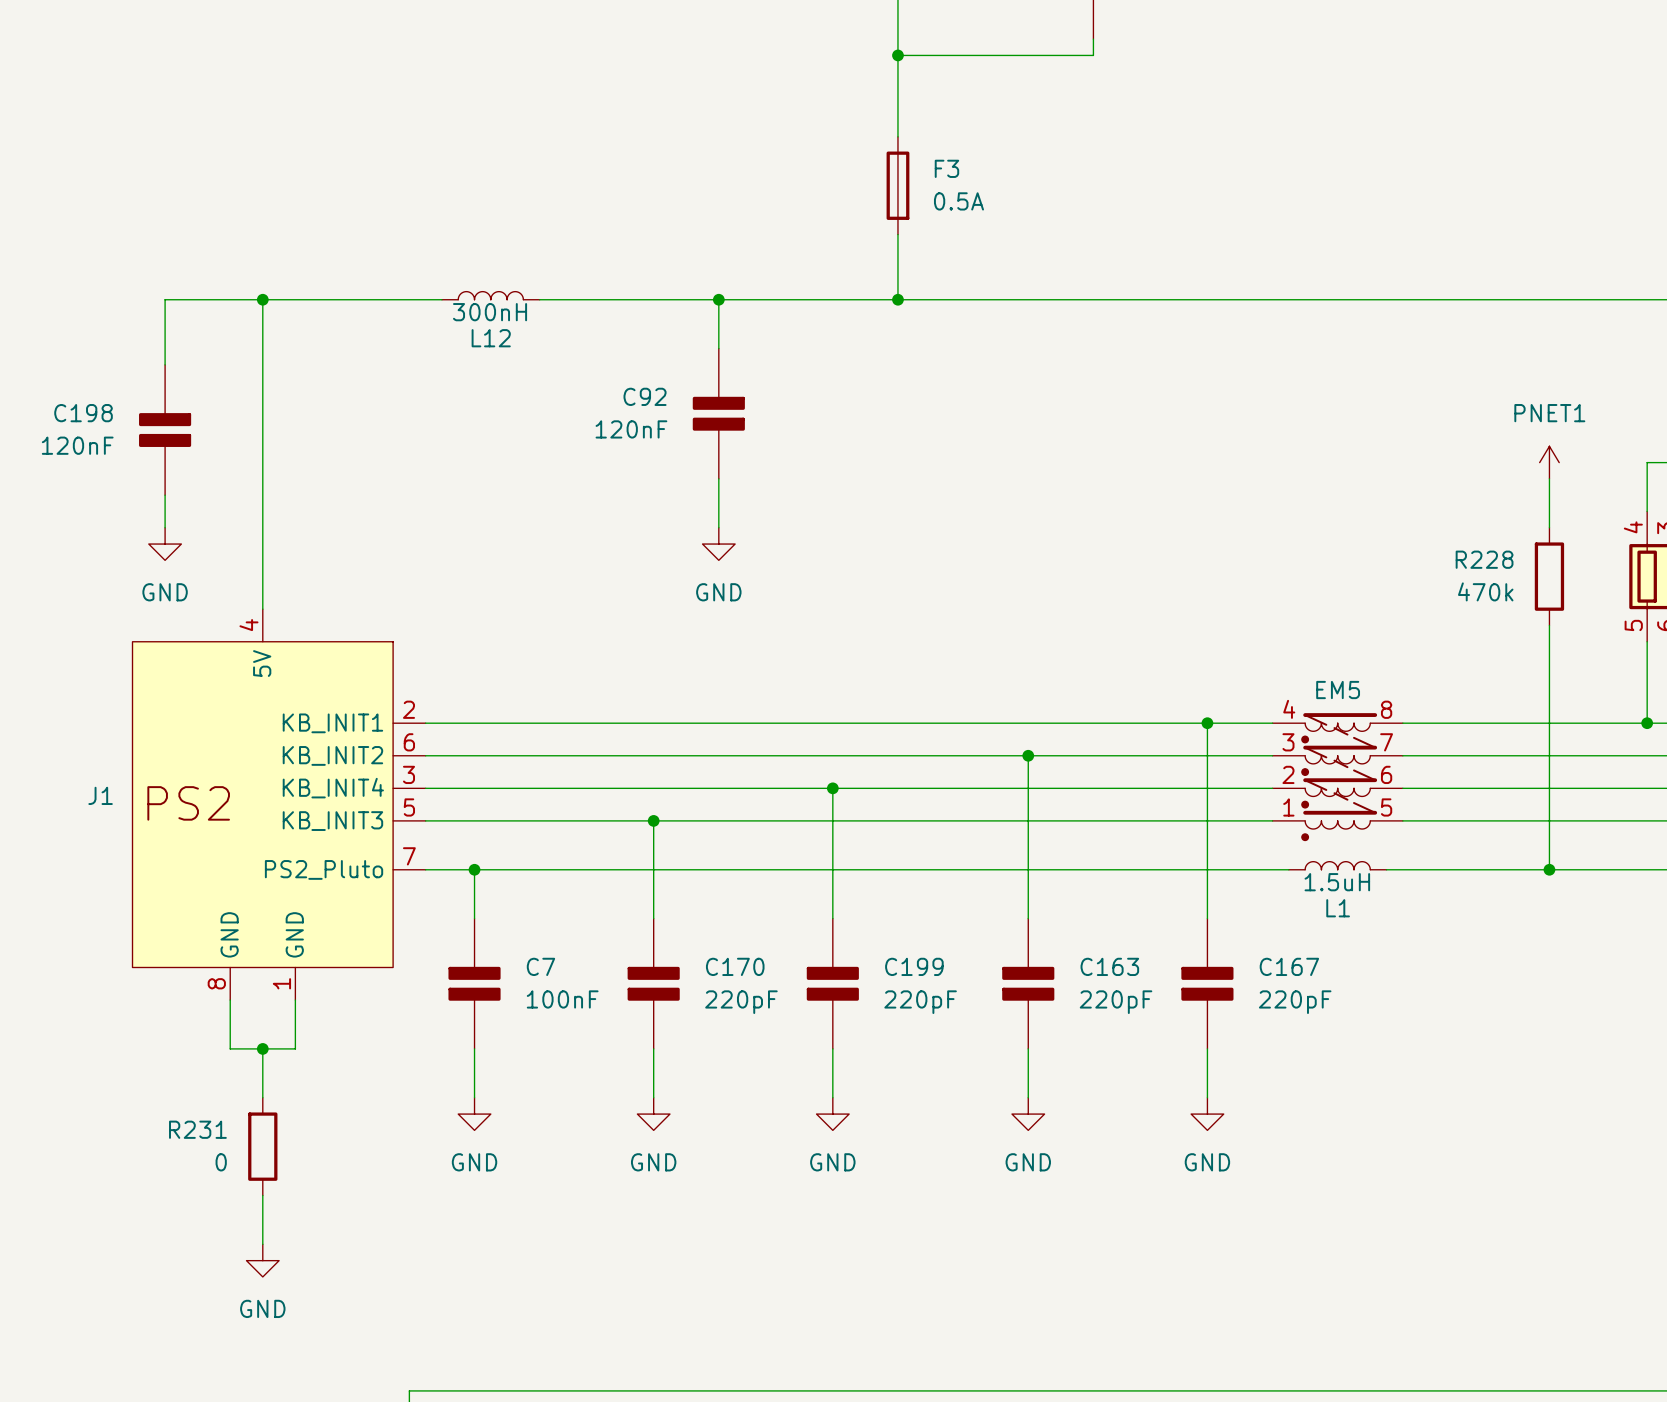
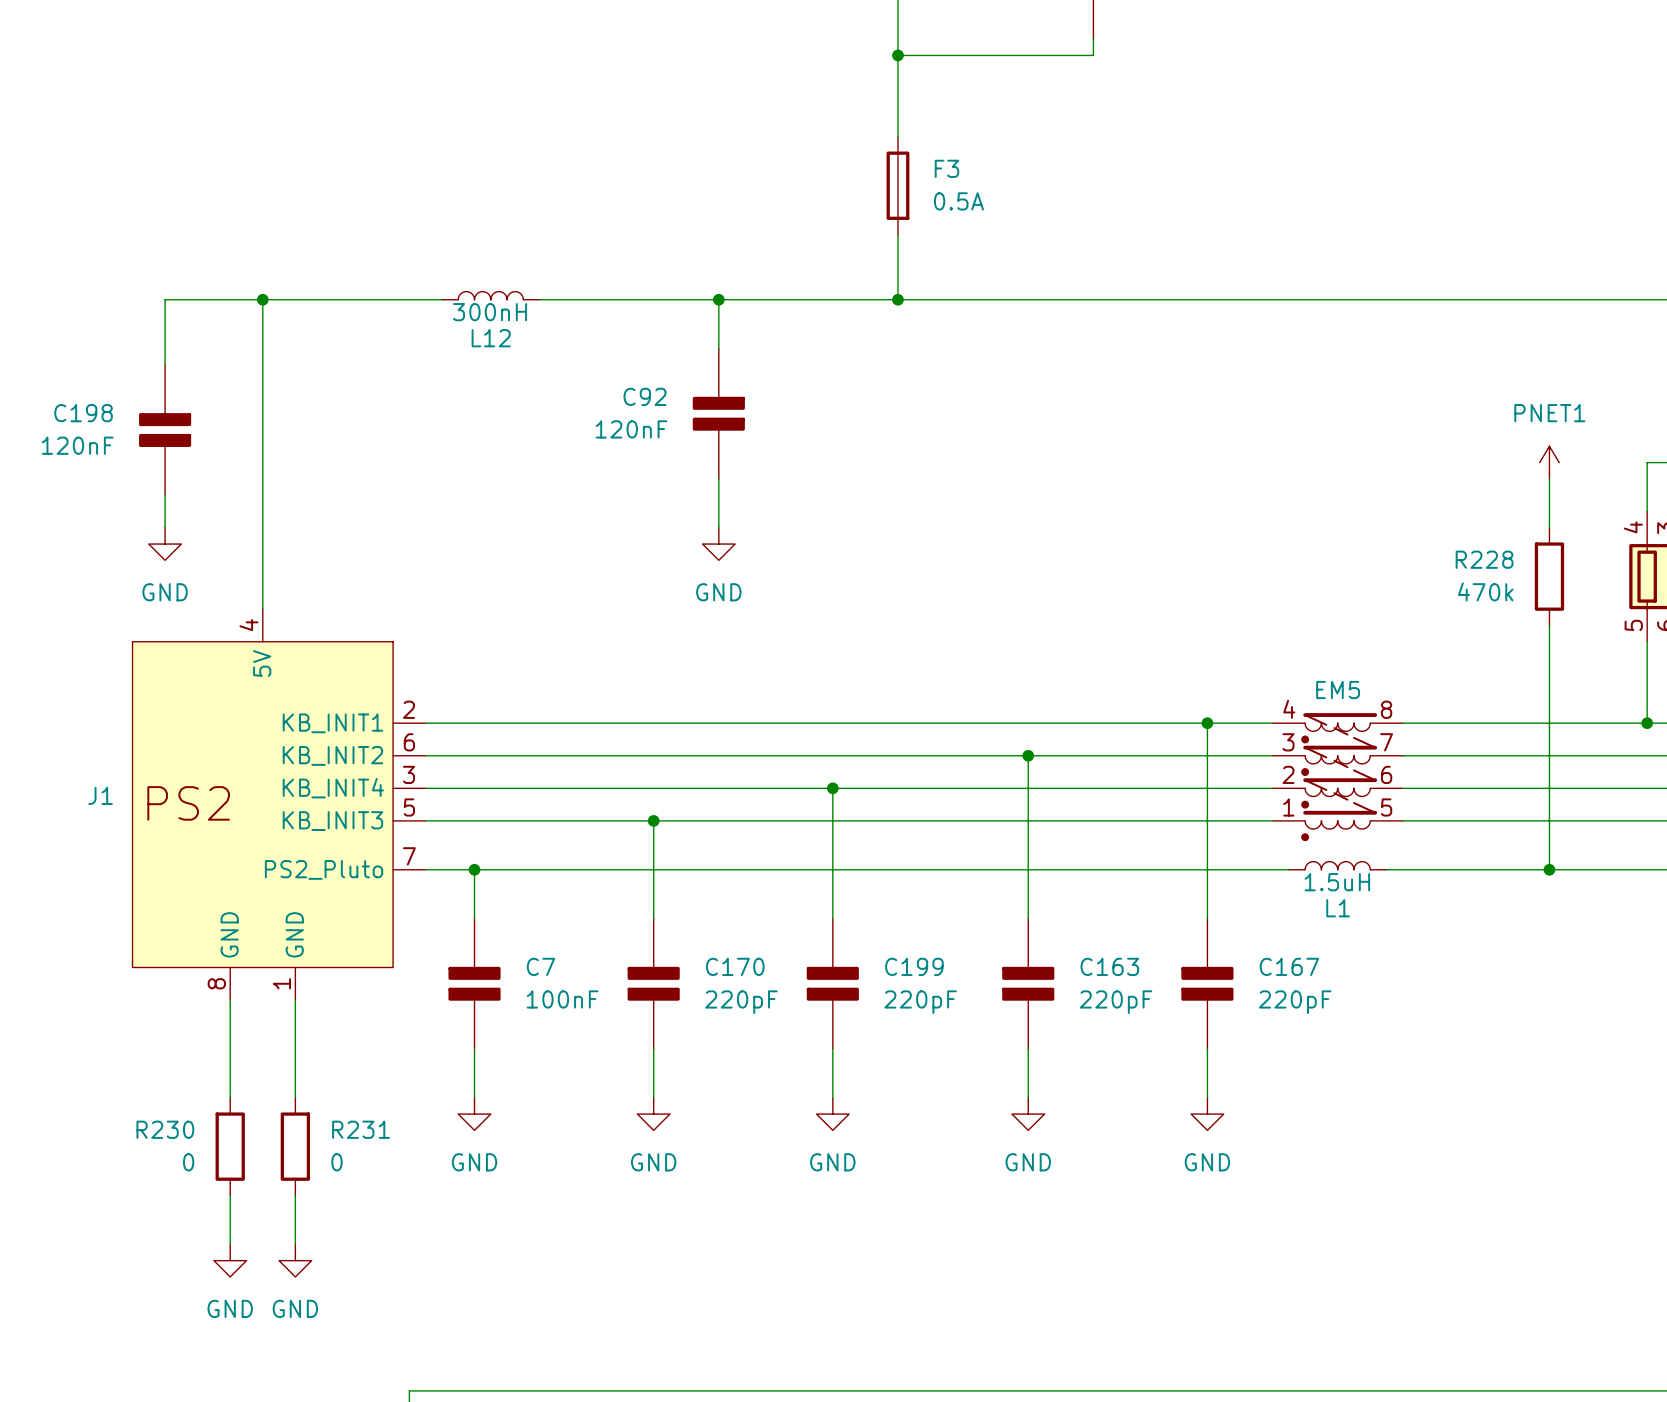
wire: (230, 1048) (295, 1048) -> (230, 1048) (230, 1097)
wire: (262, 1048) (262, 1097) -> (295, 1048) (295, 1097)
junction: (262, 1048) -> none
R231 name position: R231 (197, 1129) -> R231 (361, 1129)
R230: none -> 0 (230, 1146)
R231 position: (262, 1146) -> (295, 1146)
R231 value position: 0 (221, 1162) -> 0 (336, 1162)
wire: none -> (230, 1195) (230, 1244)
wire: (262, 1195) (262, 1244) -> (295, 1195) (295, 1244)
power symbol: none -> GND (230, 1260)
power symbol: GND (262, 1260) -> none
power symbol: none -> GND (295, 1260)

